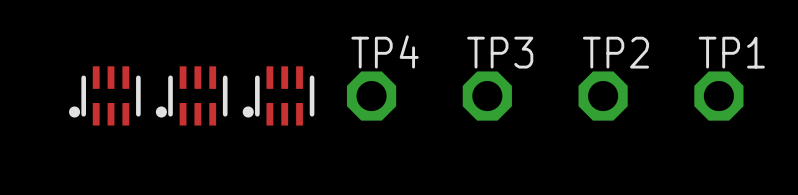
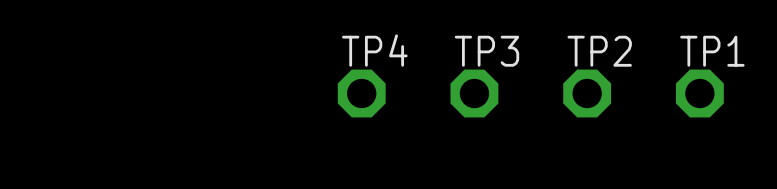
part: (104, 95) -> none
part: (191, 95) -> none
part: (278, 95) -> none

